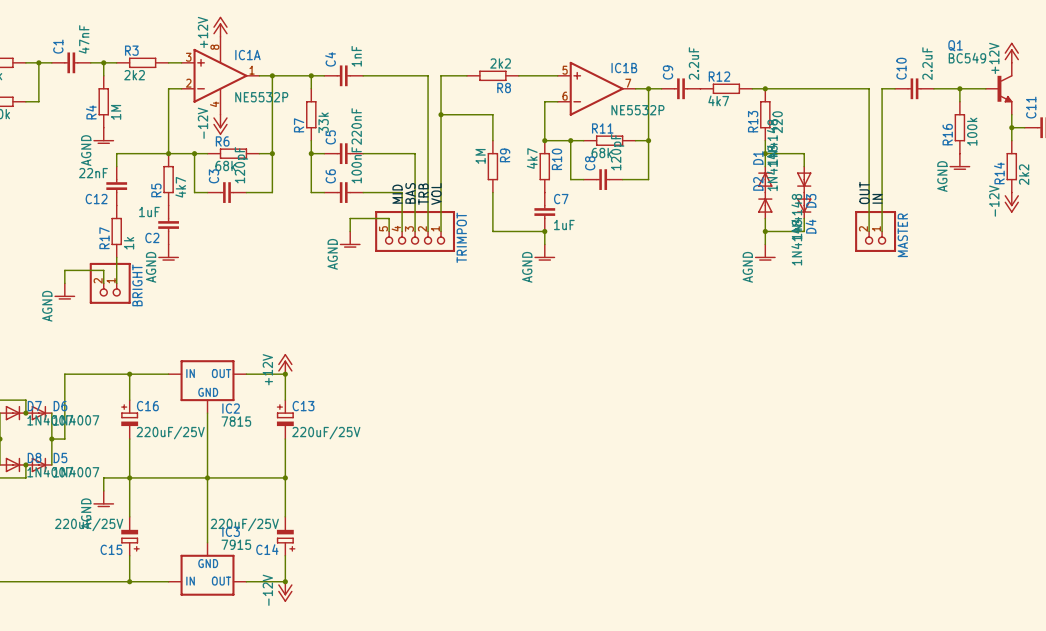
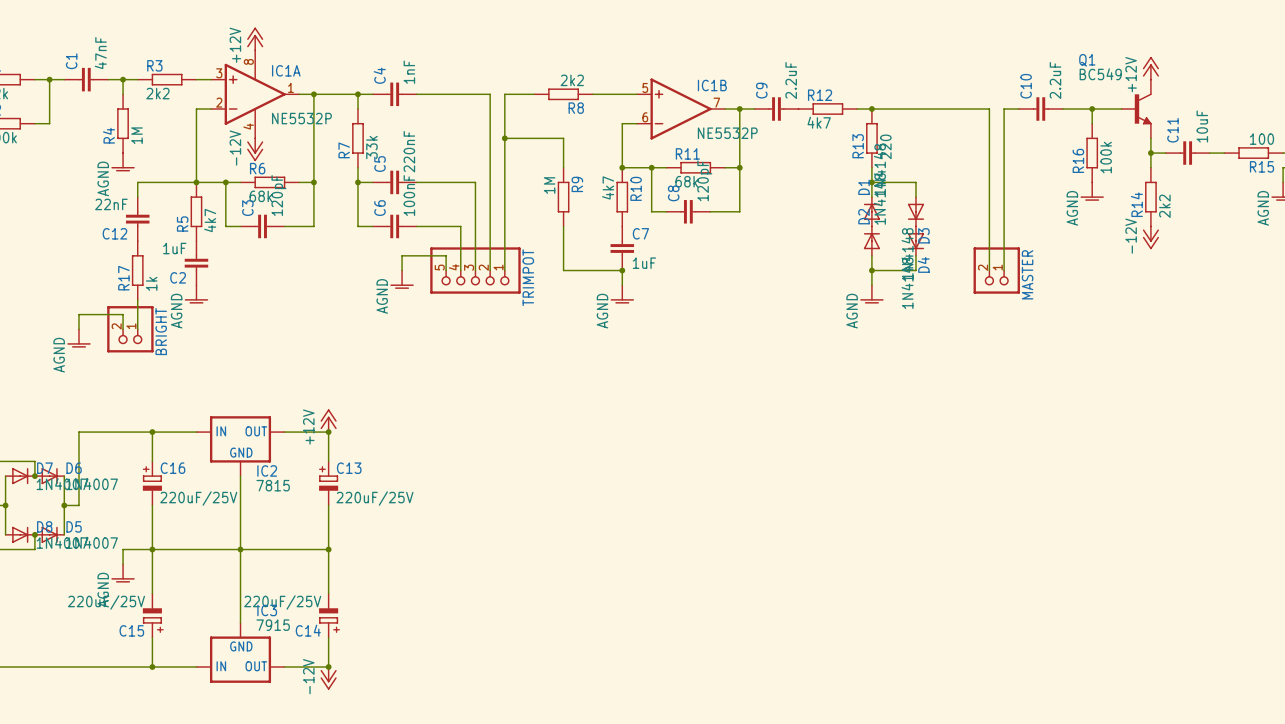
label: BAS (410, 193) -> none
label: VOL (436, 193) -> none
label: OUT (864, 193) -> none
label: MID (397, 194) -> none
label: TRB (423, 194) -> none
label: IN (877, 198) -> none

